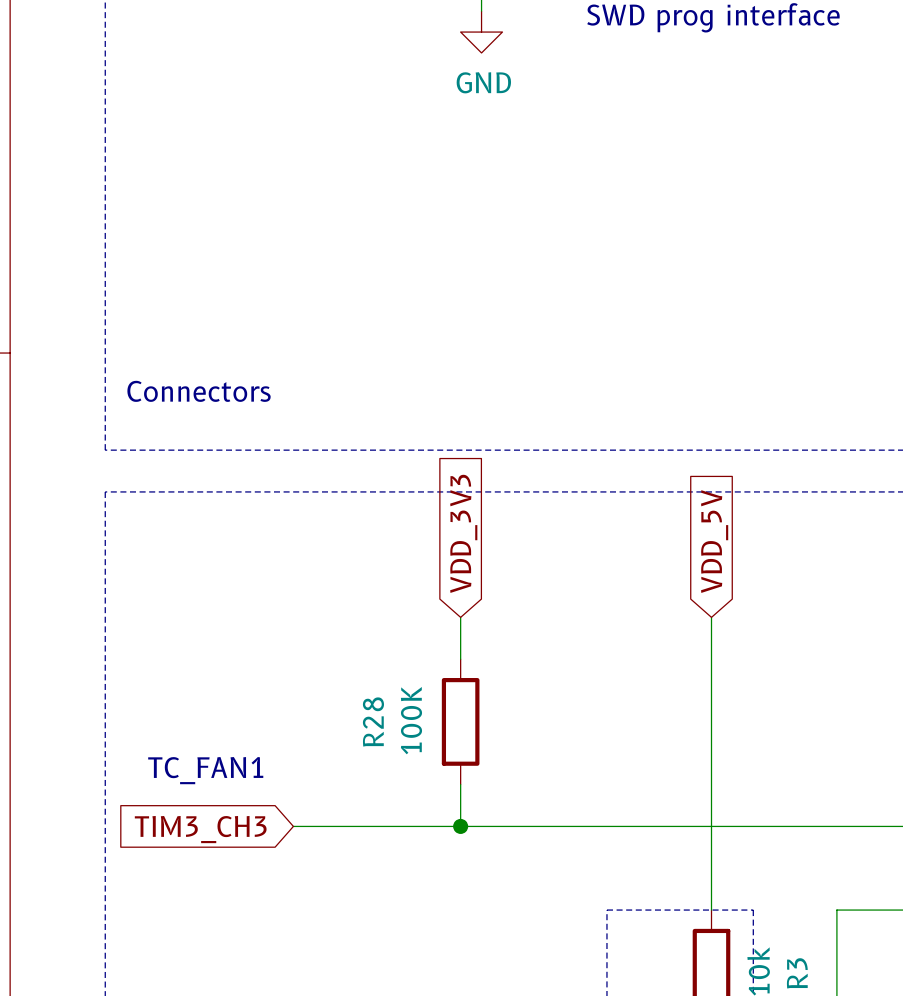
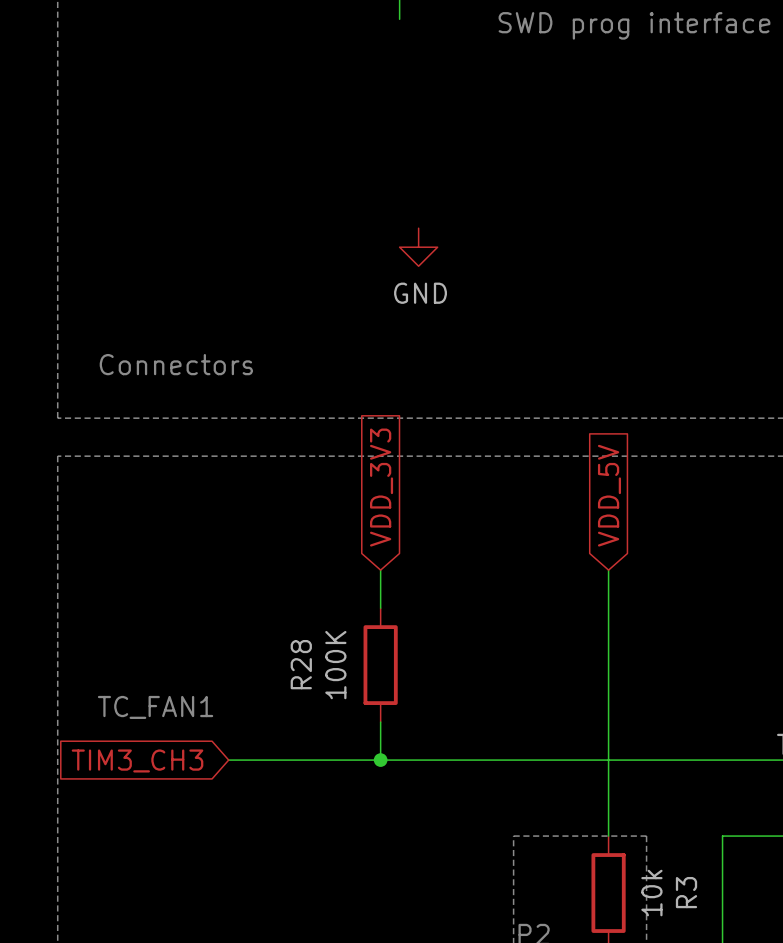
power symbol position: GND (481, 32) -> GND (418, 247)
text position: Connectors (199, 391) -> Connectors (176, 364)

